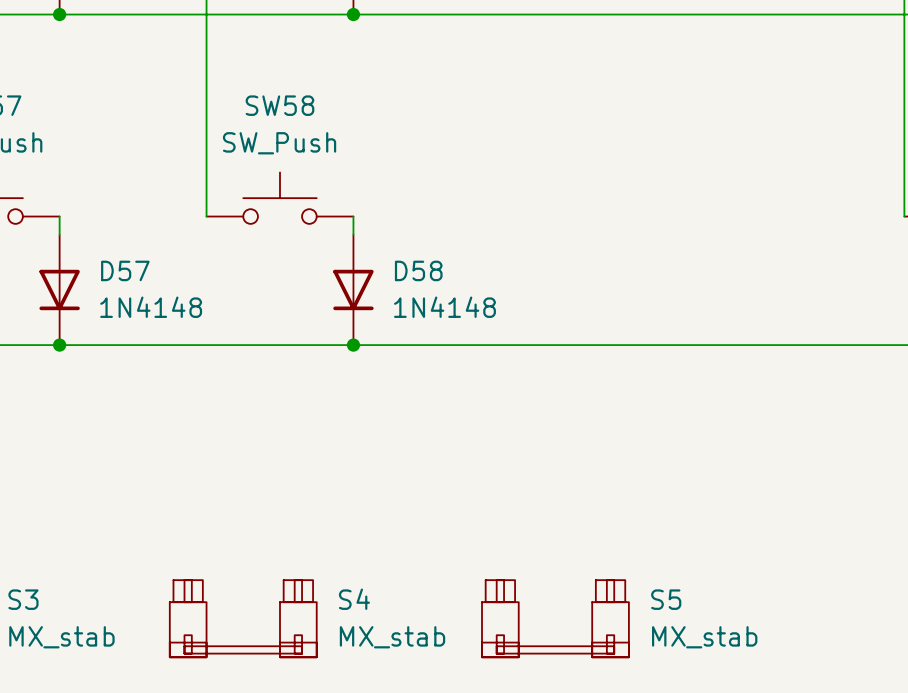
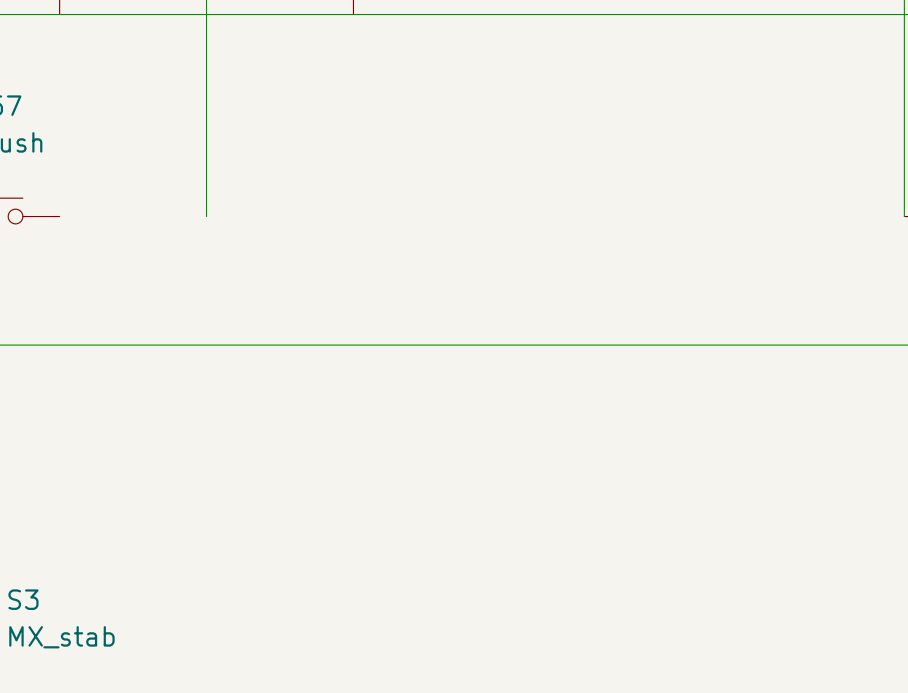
junction: (59, 14) -> none
junction: (353, 14) -> none
SW58: SW_Push (279, 198) -> none
wire: (59, 216) (59, 234) -> none
wire: (353, 216) (353, 234) -> none
D57: 1N4148 (59, 289) -> none
D58: 1N4148 (353, 289) -> none
junction: (59, 345) -> none
junction: (353, 345) -> none
S4: MX_stab (243, 618) -> none
S5: MX_stab (555, 618) -> none

